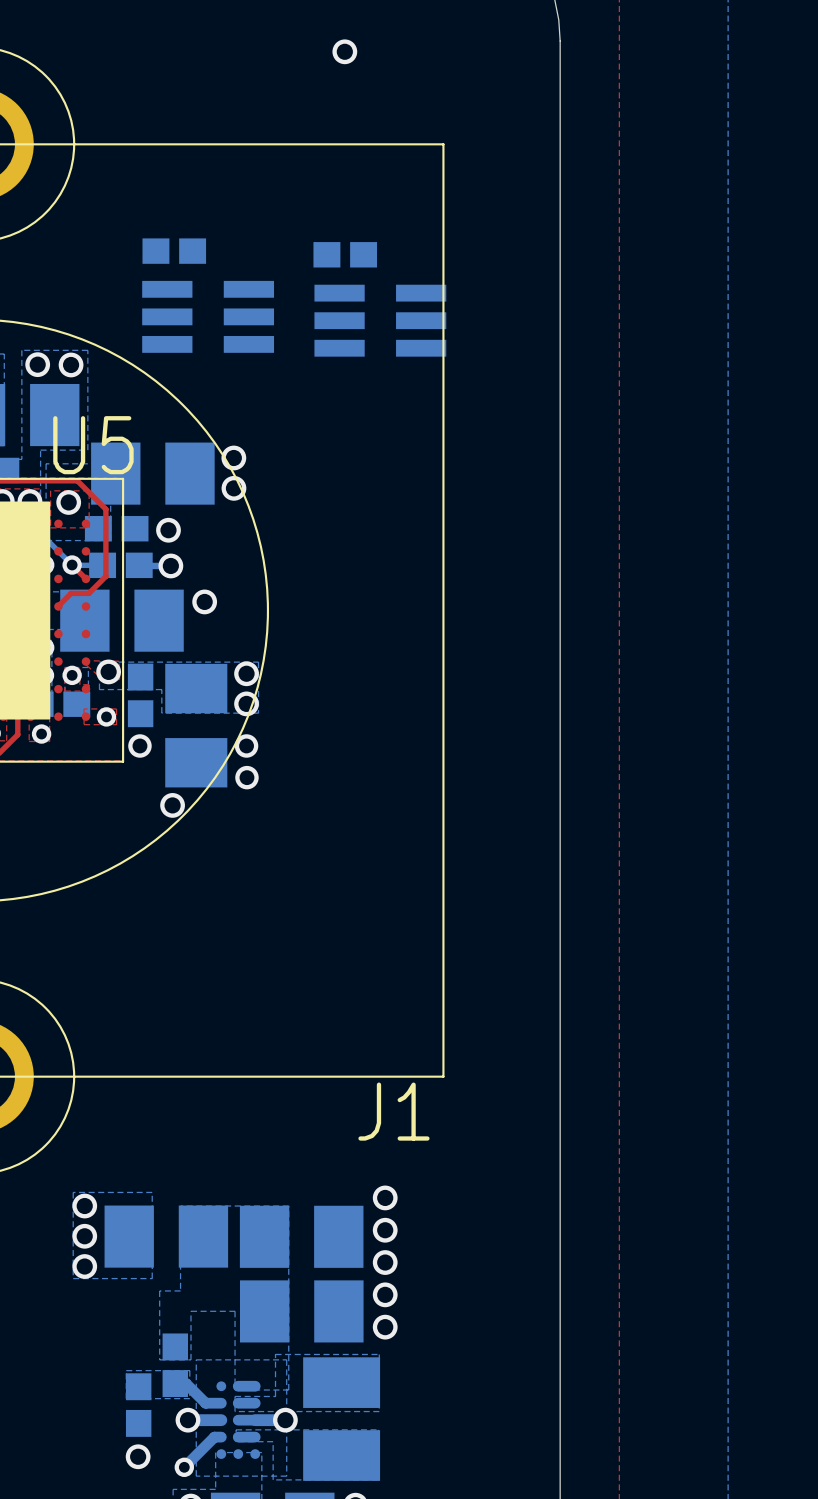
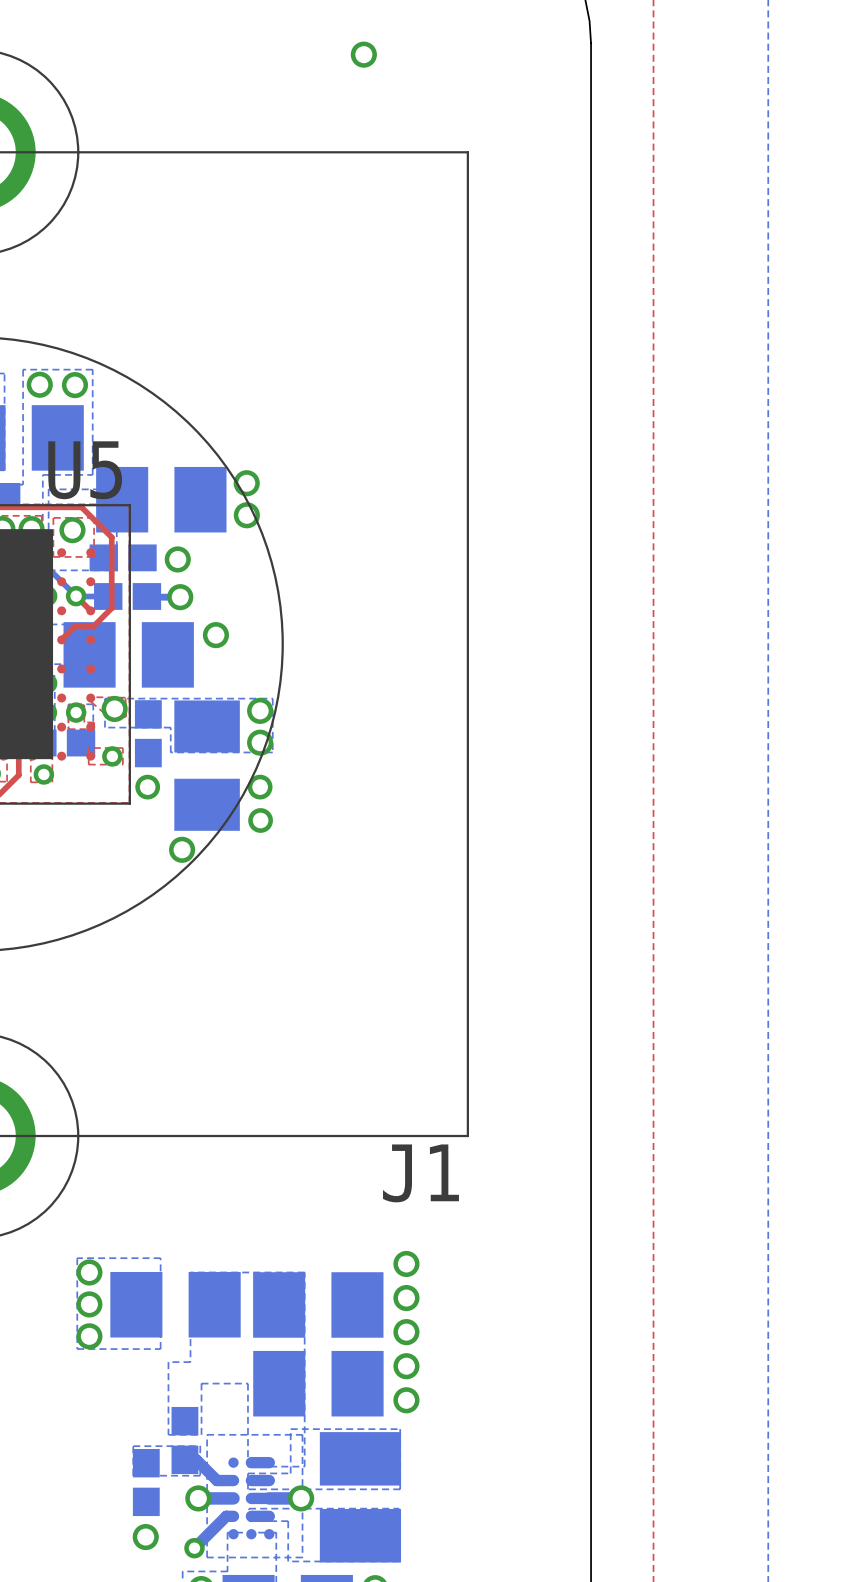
part: (174, 251) -> none
part: (345, 254) -> none
part: (208, 316) -> none
part: (380, 320) -> none

